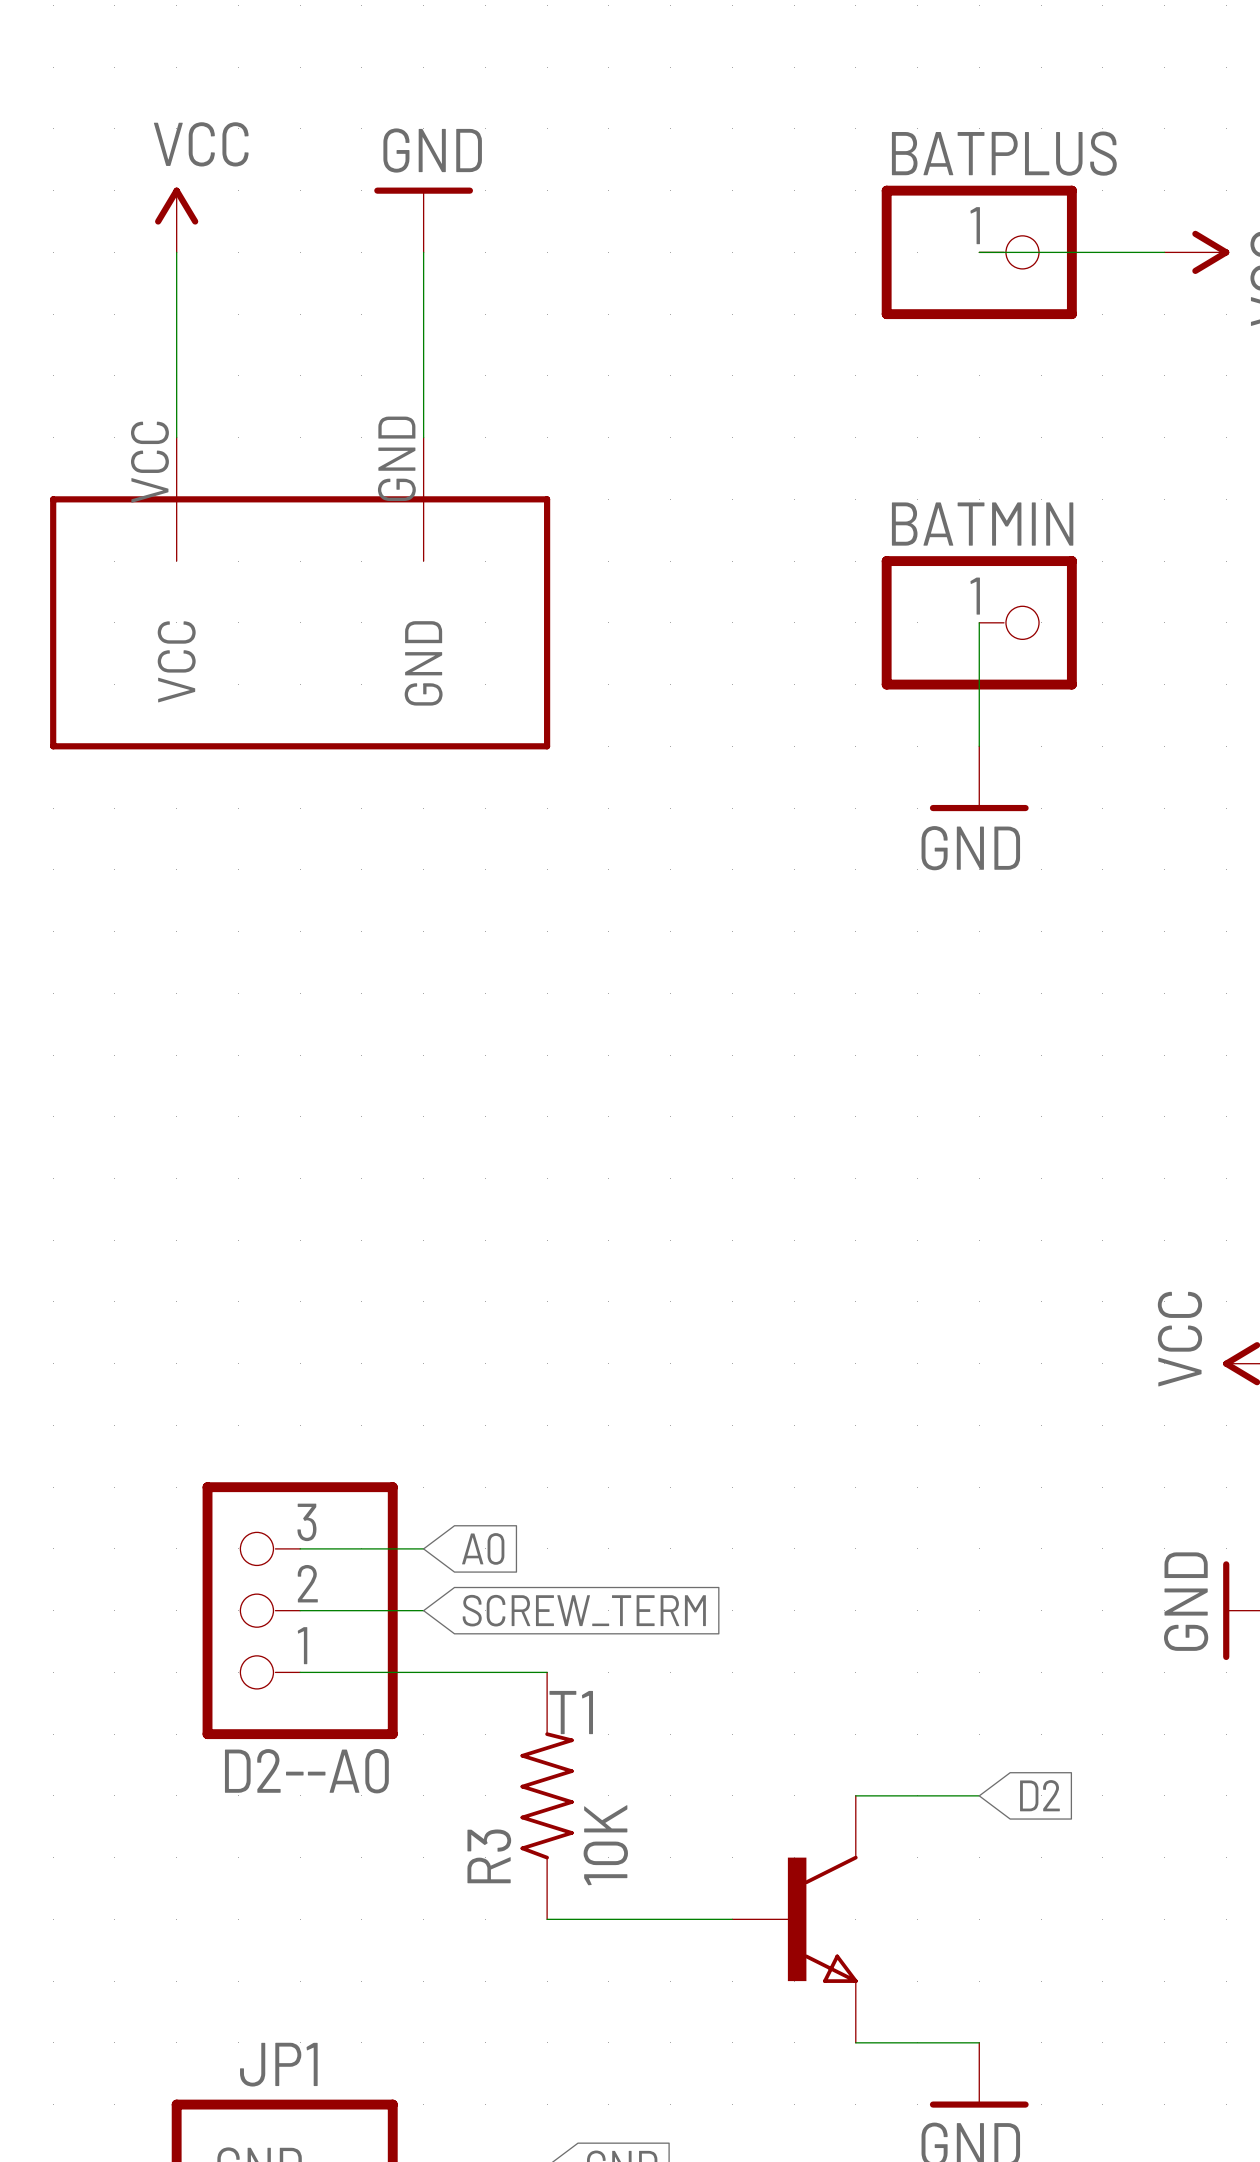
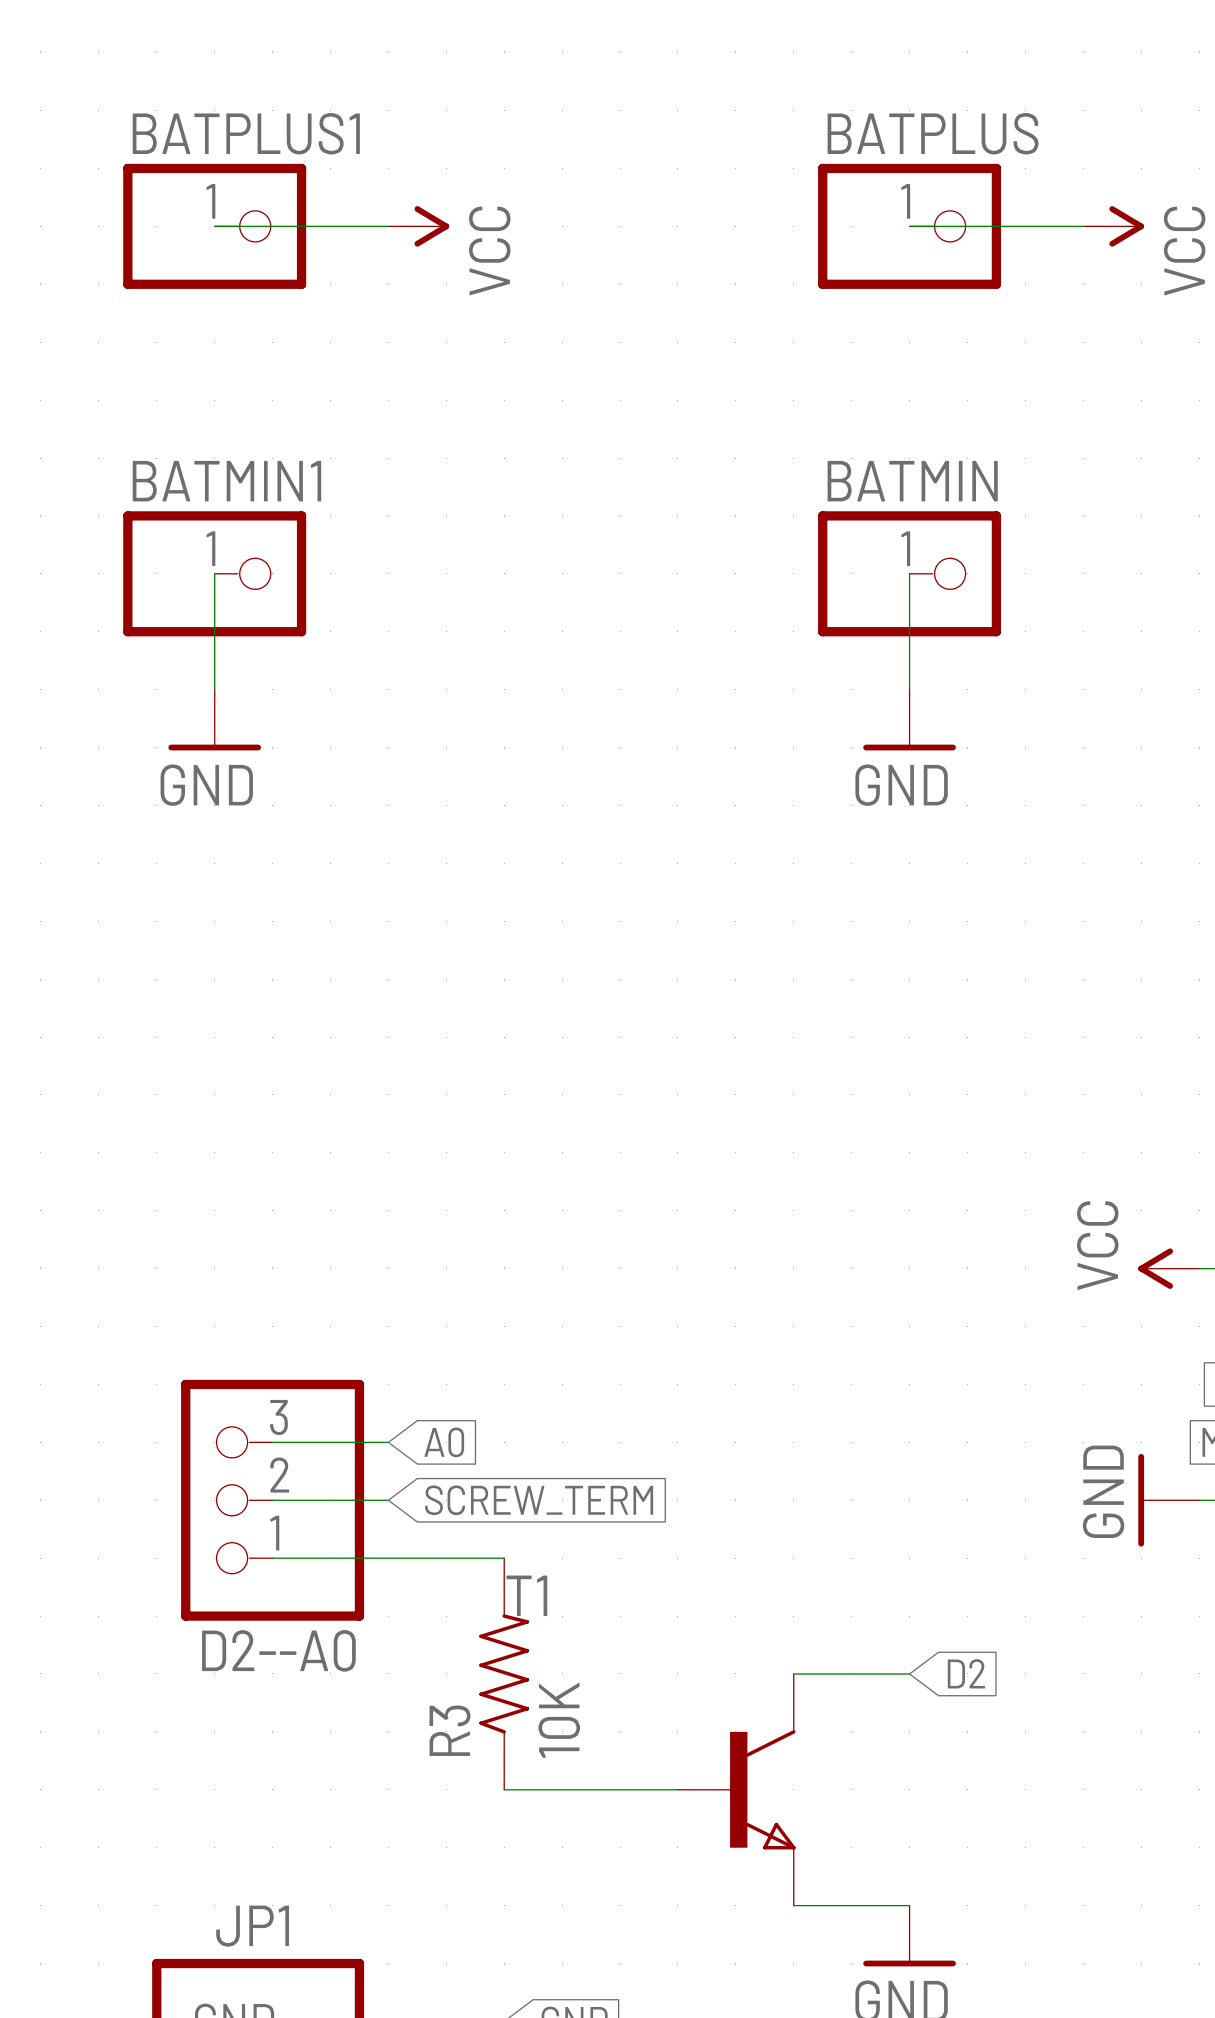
power symbol rotation: 0° (423, 190) -> 180° (214, 747)
power symbol rotation: 0° (176, 206) -> 90° clockwise (431, 226)
power symbol position: VCC (176, 219) -> VCC (418, 226)
power symbol position: GND (423, 219) -> GND (214, 720)
wire: (176, 252) (176, 437) -> none
BATPLUS1: none -> (214, 226)
wire: (423, 252) (423, 437) -> (388, 226) (214, 226)
part: (300, 593) -> none
wire: none -> (214, 573) (214, 689)
BATMIN1: none -> (214, 573)

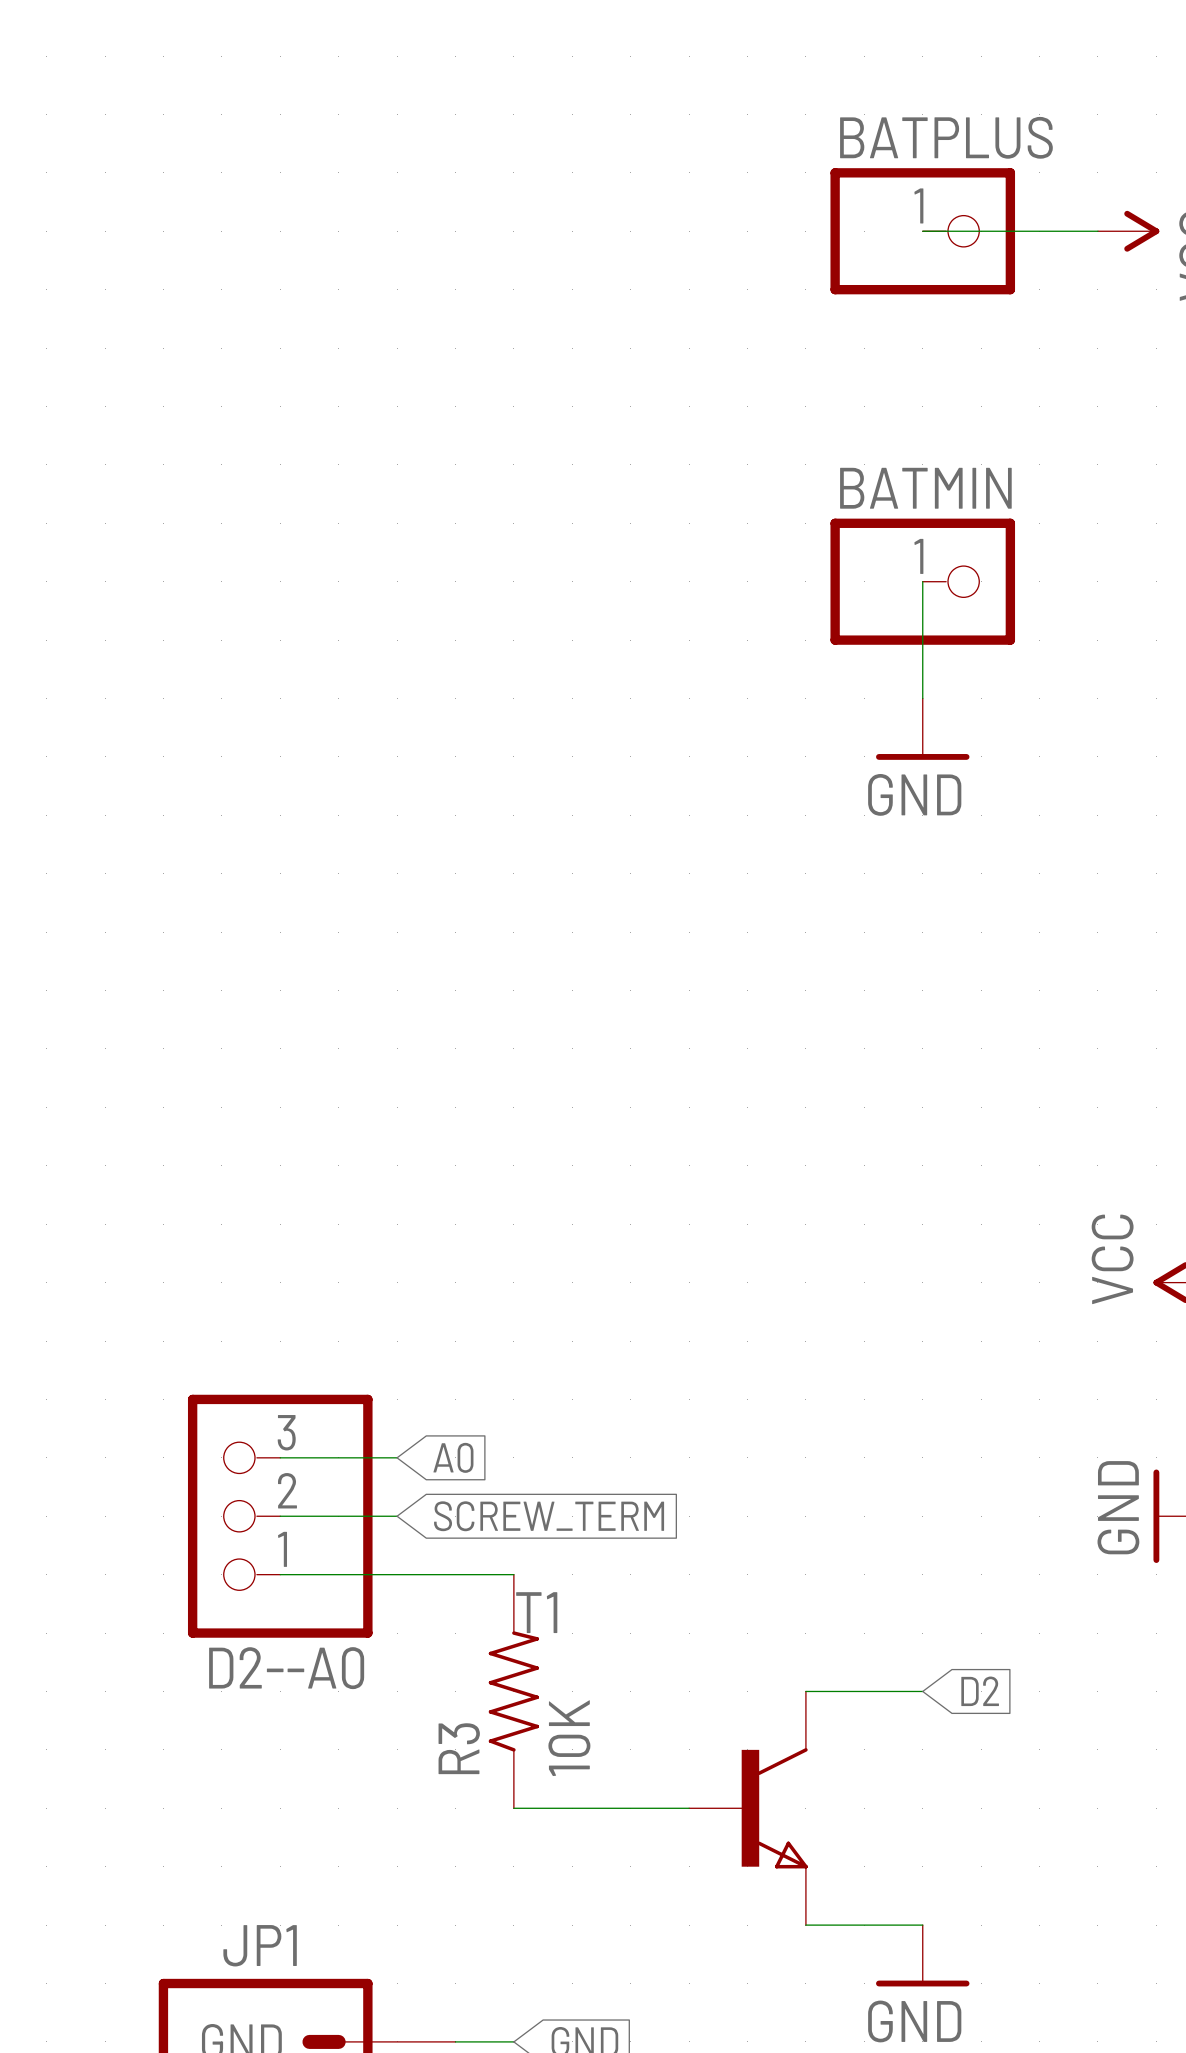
wire: (214, 226) (388, 226) -> none
BATPLUS1: (214, 226) -> none
power symbol: VCC (418, 226) -> none
wire: (214, 573) (214, 689) -> none
BATMIN1: (214, 573) -> none
power symbol: GND (214, 720) -> none

